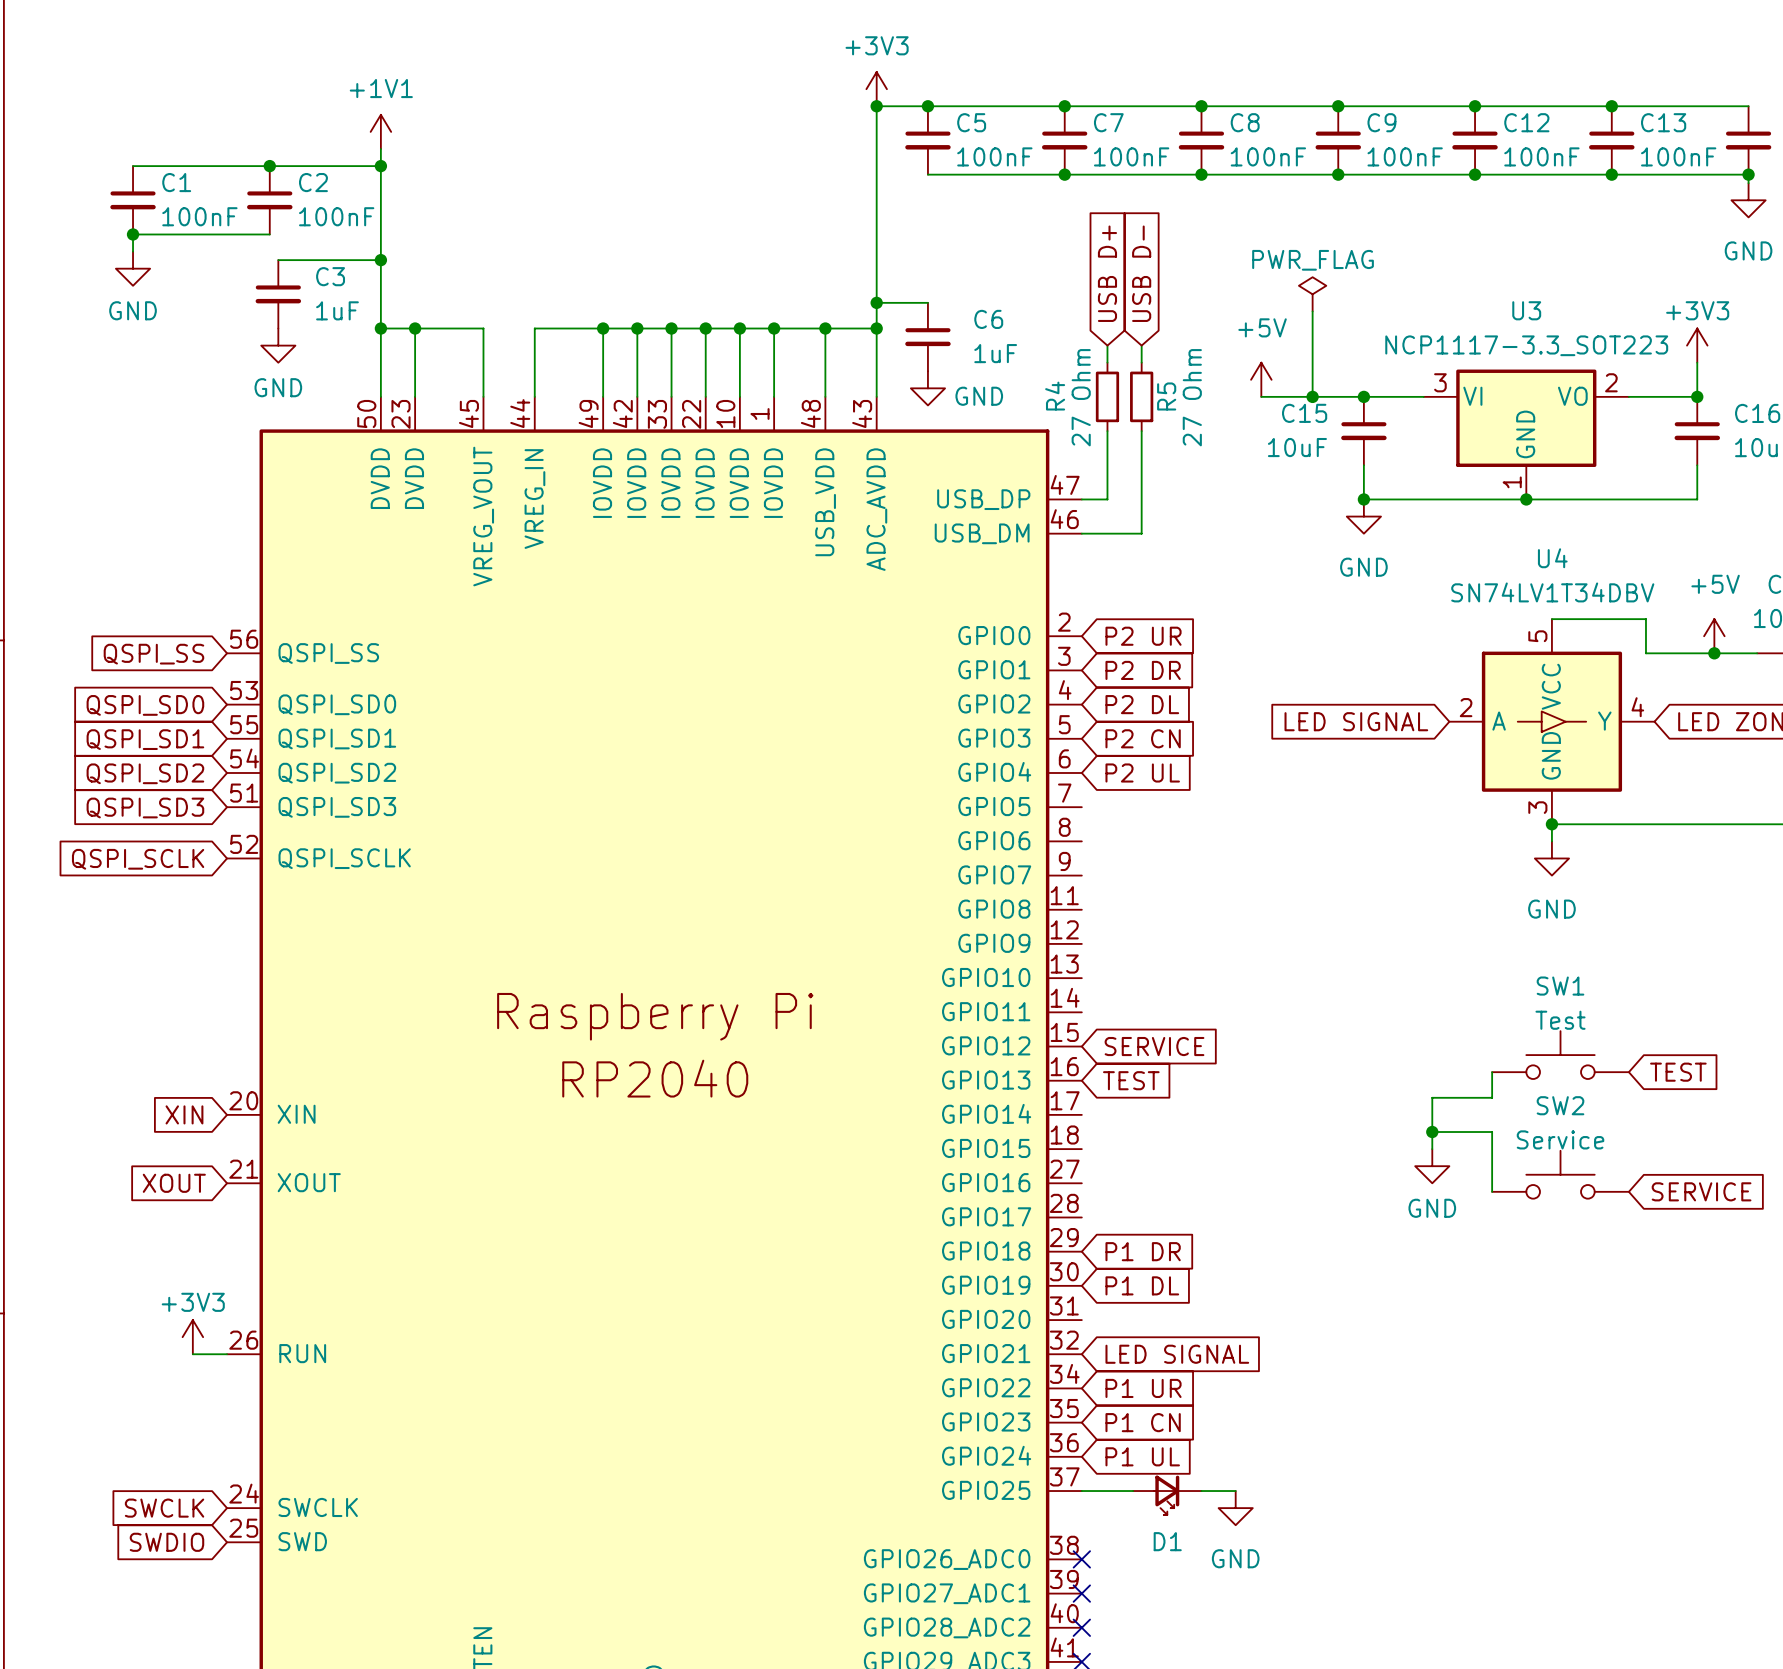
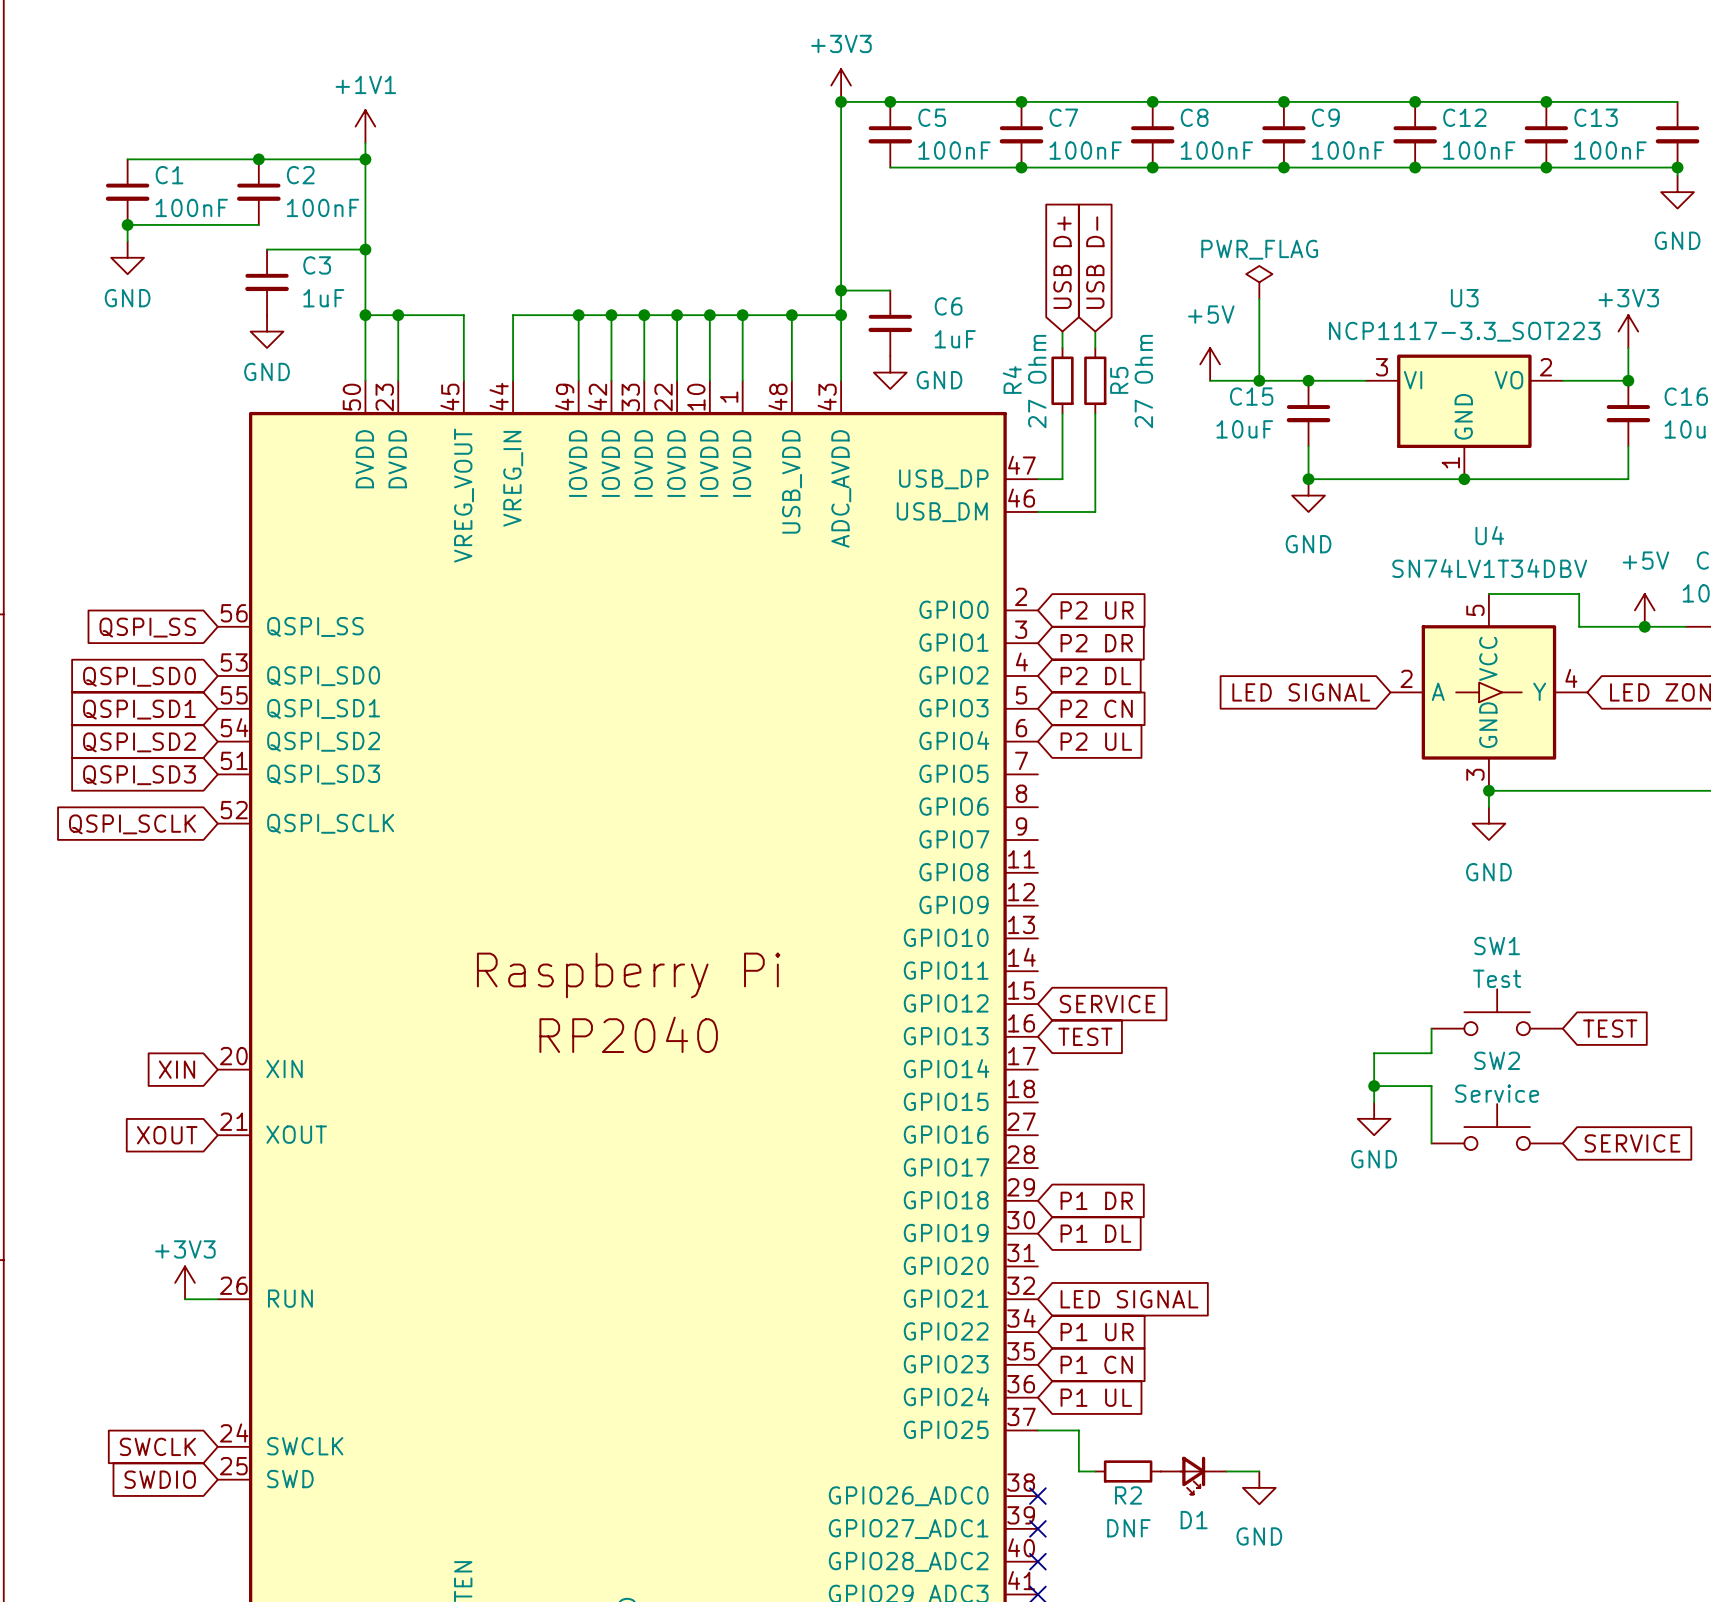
wire: (1124, 1491) (1133, 1491) -> (1078, 1430) (1078, 1471) (1095, 1471)
wire: (1201, 1491) (1235, 1491) -> (1226, 1471) (1259, 1471)
D1 position: (1167, 1495) -> (1193, 1475)
power symbol position: GND (1235, 1508) -> GND (1259, 1487)
R2: none -> DNF (1128, 1471)

